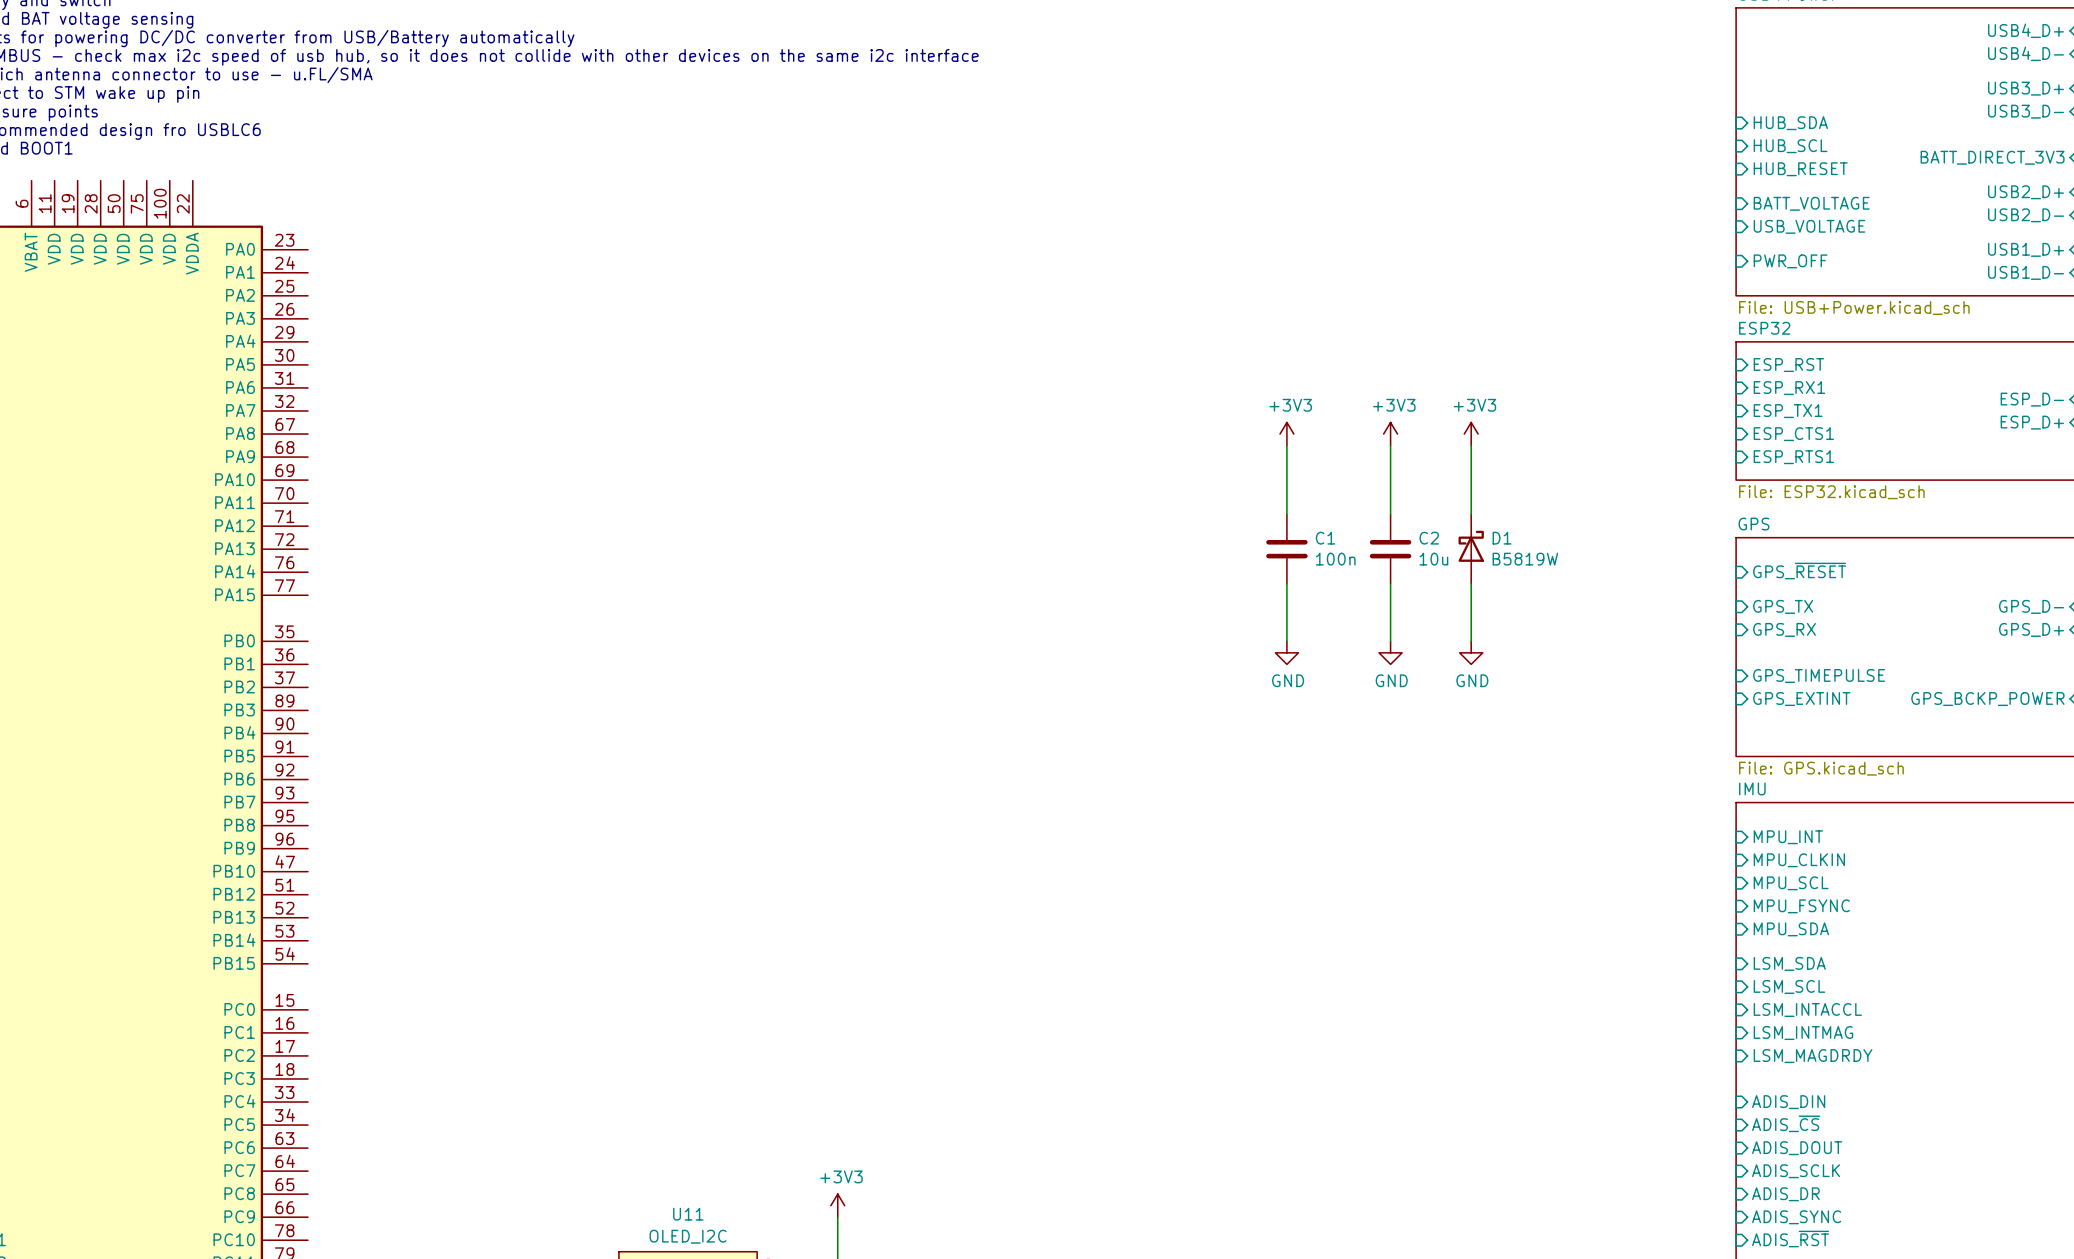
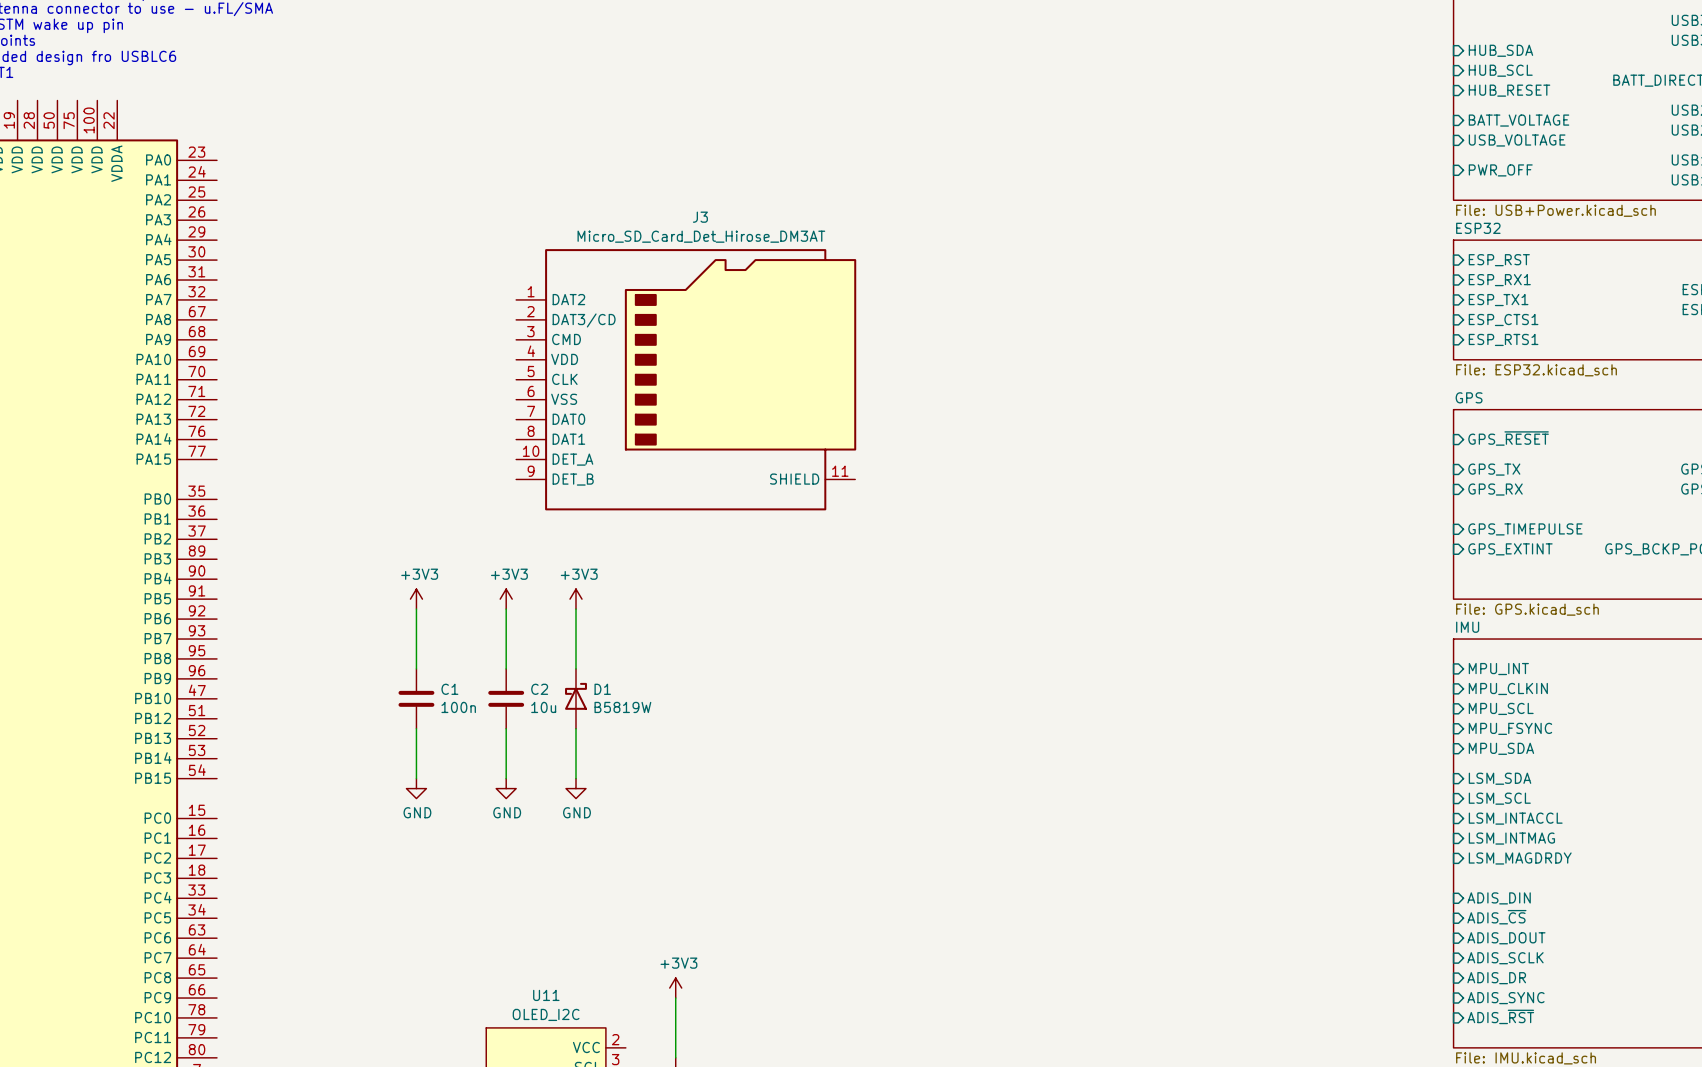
power symbol: +3V3 (1286, 434) -> none
power symbol: +3V3 (1390, 434) -> none
power symbol: +3V3 (1471, 434) -> none
wire: (1286, 445) (1286, 514) -> none
wire: (1390, 445) (1390, 514) -> none
wire: (1471, 445) (1471, 514) -> none
J3: none -> Micro_SD_Card_Det_Hirose_DM3AT (686, 379)
C1 position: (1286, 549) -> (416, 698)
C2 position: (1390, 549) -> (506, 698)
D1 position: (1471, 549) -> (576, 698)
wire: (1286, 583) (1286, 641) -> none
wire: (1390, 583) (1390, 641) -> none
wire: (1471, 583) (1471, 641) -> none
power symbol: GND (1286, 652) -> none
power symbol: GND (1390, 652) -> none
power symbol: GND (1471, 652) -> none
power symbol: none -> +3V3 (416, 599)
power symbol: none -> +3V3 (506, 599)
power symbol: none -> +3V3 (576, 599)
wire: none -> (416, 609) (416, 668)
wire: none -> (506, 609) (506, 668)
wire: none -> (576, 609) (576, 668)
wire: none -> (416, 728) (416, 778)
wire: none -> (506, 728) (506, 778)
wire: none -> (576, 728) (576, 778)
power symbol: none -> GND (416, 788)
power symbol: none -> GND (506, 788)
power symbol: none -> GND (576, 788)

